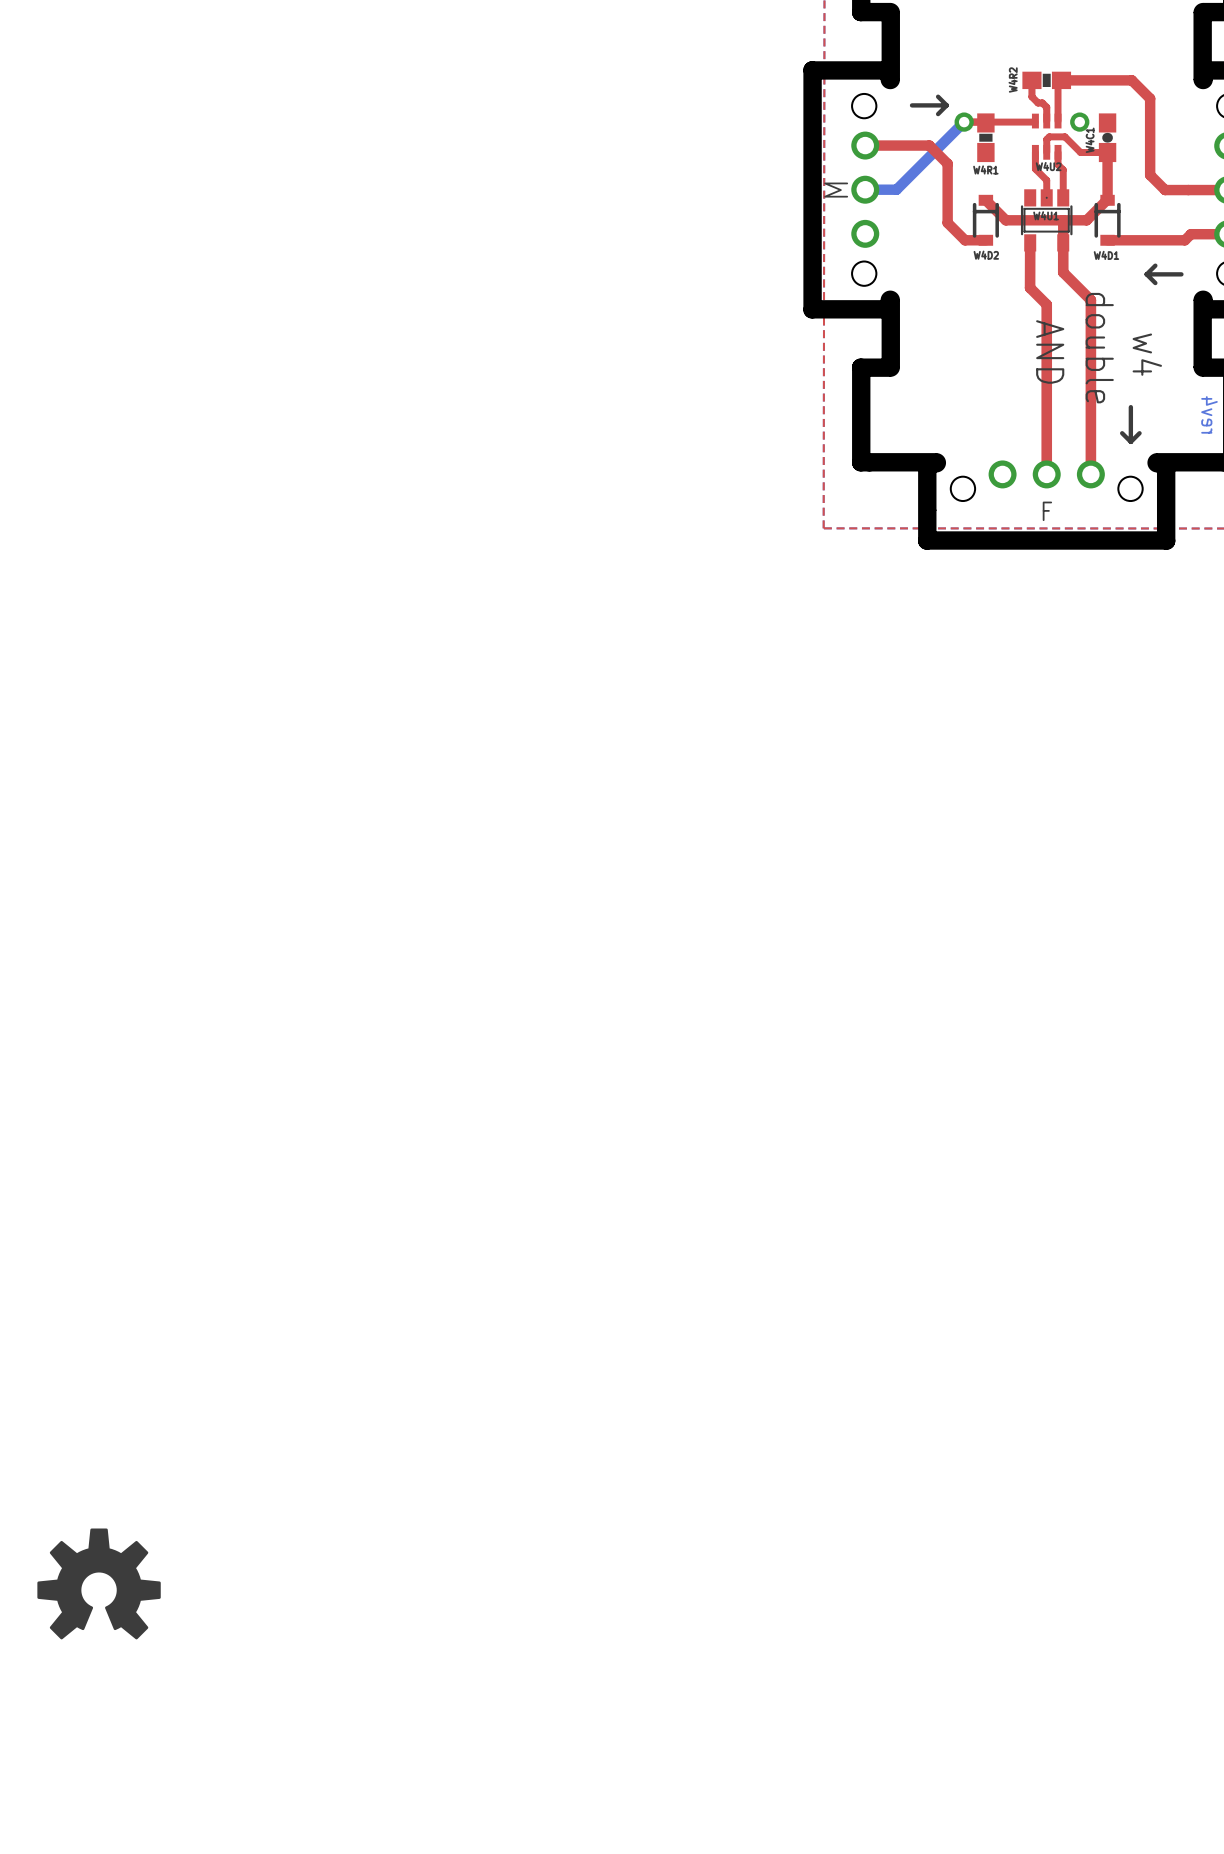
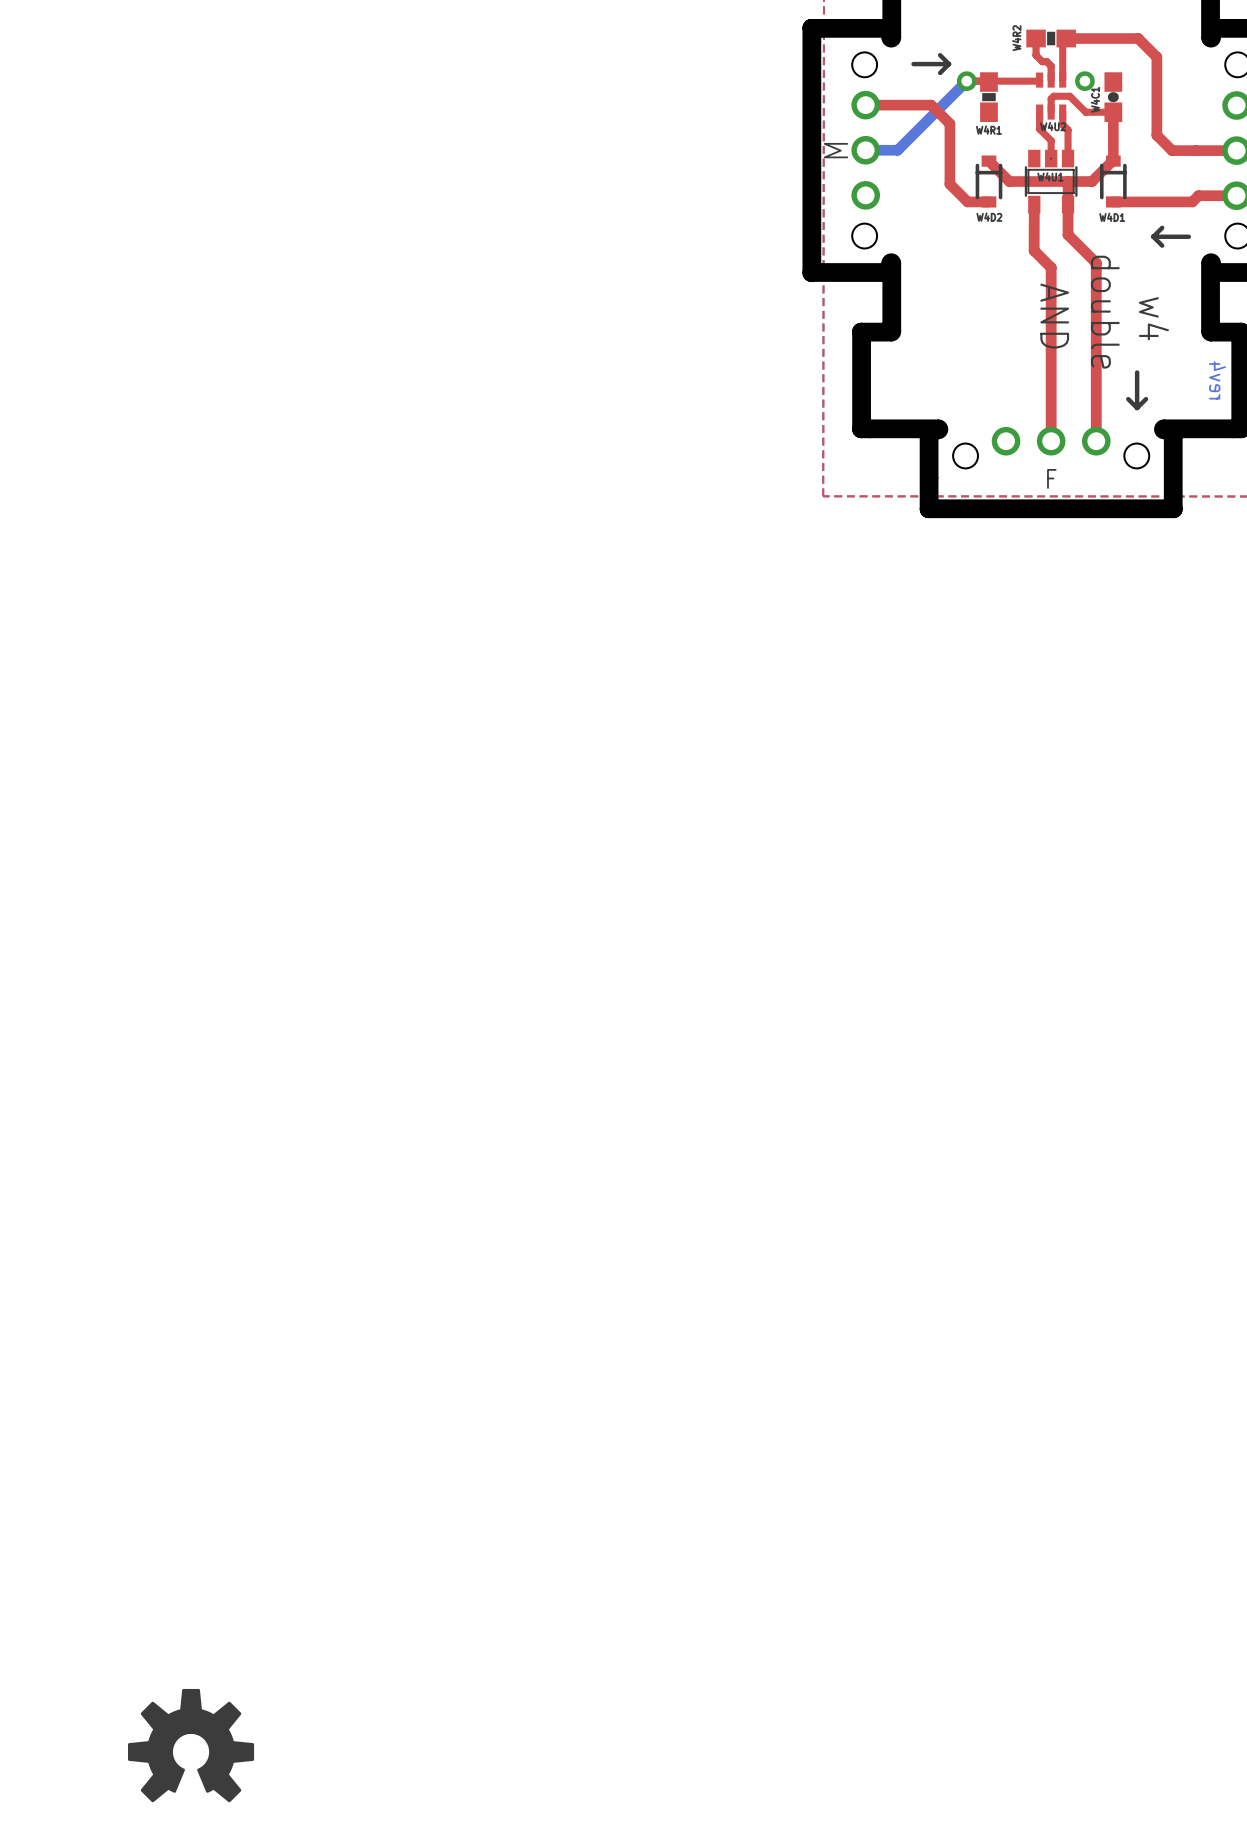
drawing position: (99, 1583) -> (191, 1745)

